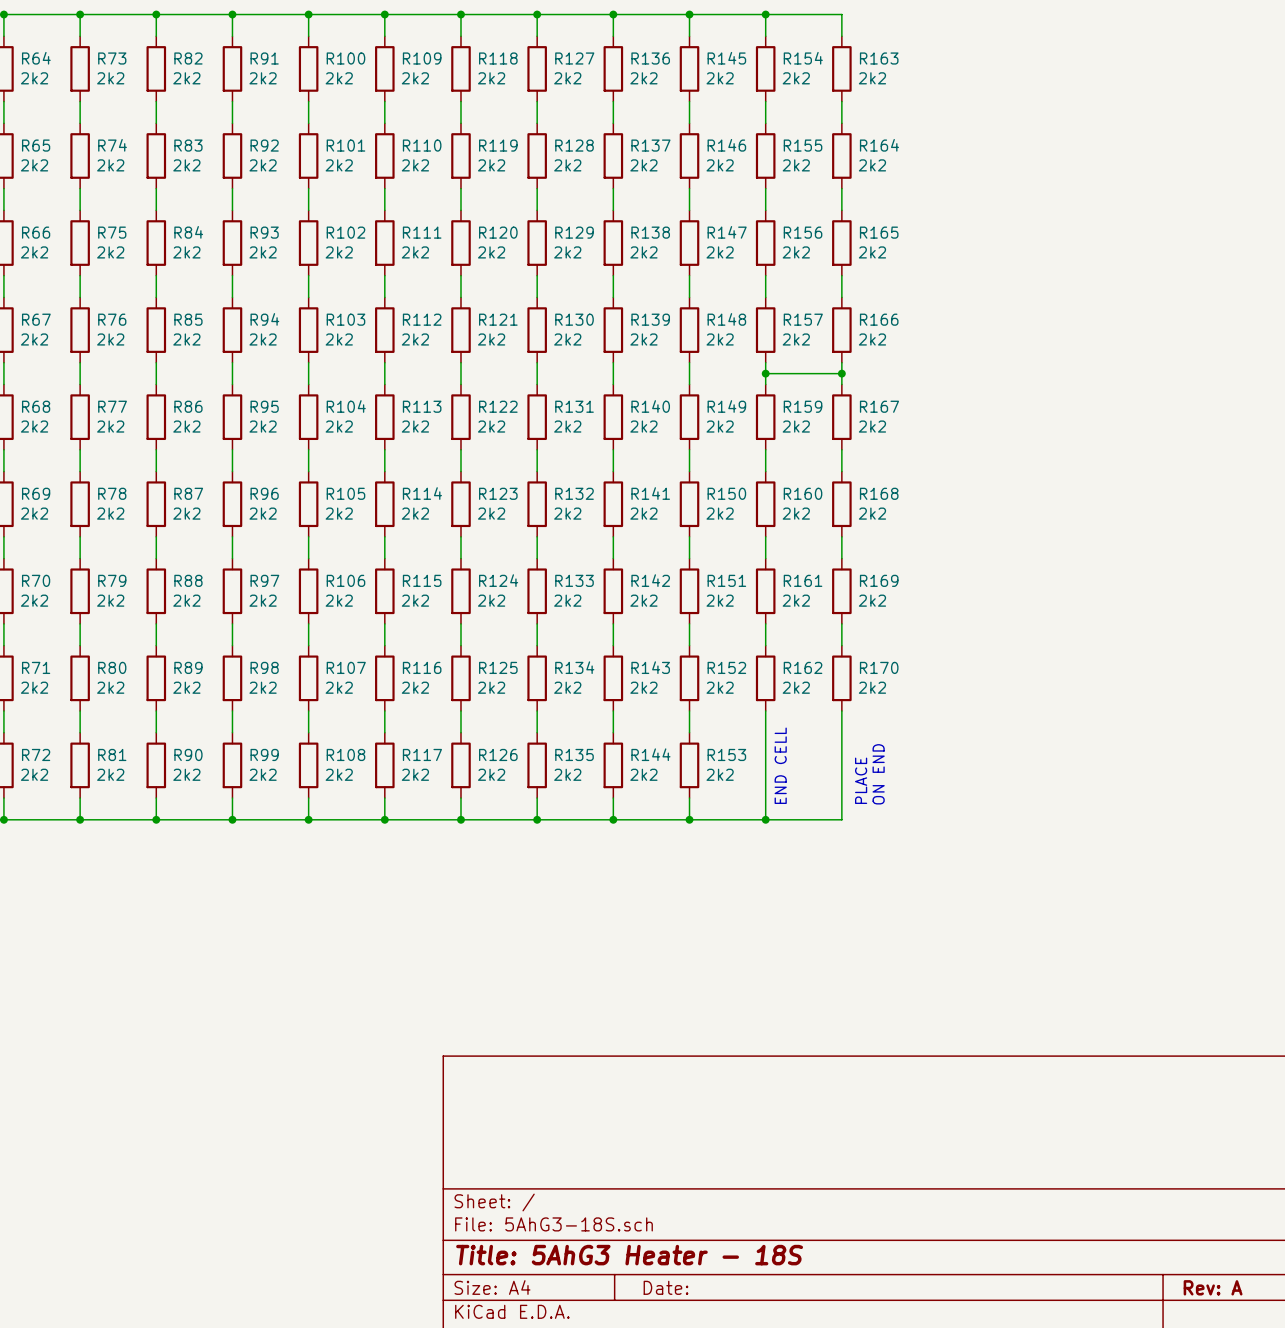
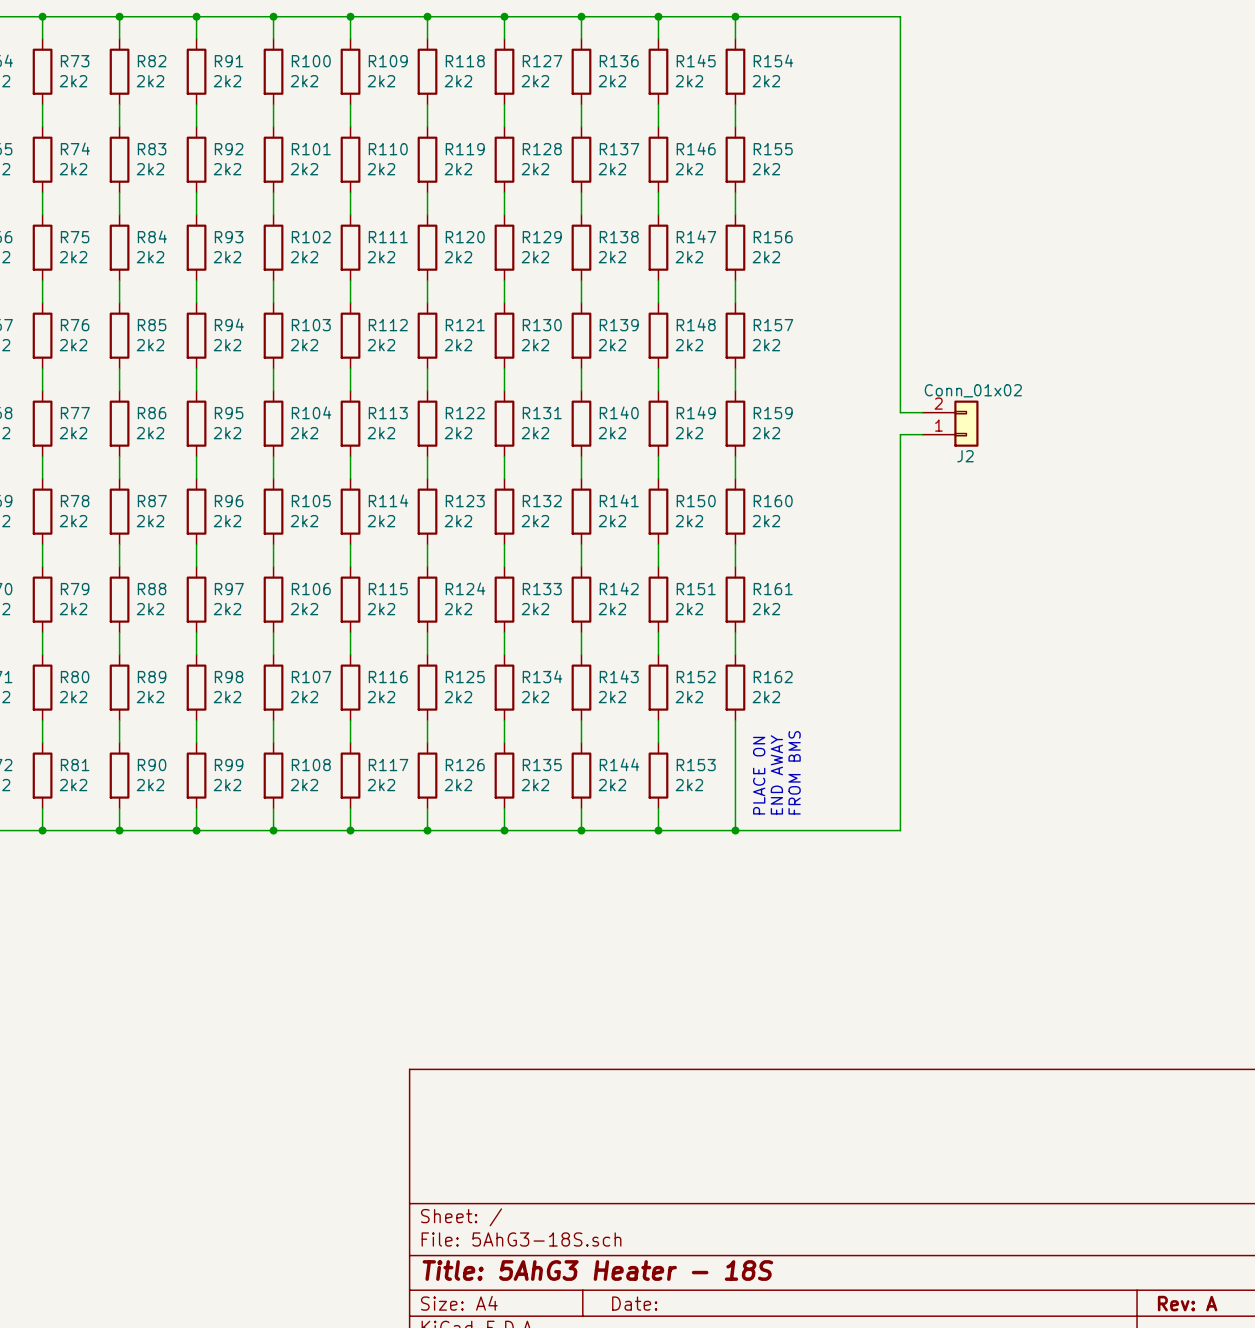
wire: (841, 14) (841, 36) -> (812, 16) (900, 16) (900, 412) (922, 412)
R163: 2k2 (841, 68) -> none
wire: (841, 101) (841, 123) -> none
R164: 2k2 (841, 155) -> none
wire: (841, 188) (841, 210) -> none
R165: 2k2 (841, 243) -> none
wire: (841, 275) (841, 297) -> none
R166: 2k2 (841, 330) -> none
wire: (841, 362) (841, 384) -> none
wire: (765, 373) (841, 373) -> none
junction: (765, 373) -> none
junction: (841, 373) -> none
R167: 2k2 (841, 417) -> none
J2: none -> Conn_01x02 (950, 423)
wire: (841, 449) (841, 471) -> none
R168: 2k2 (841, 504) -> none
wire: (841, 536) (841, 558) -> none
R169: 2k2 (841, 591) -> none
wire: (841, 623) (841, 645) -> none
R170: 2k2 (841, 678) -> none
wire: (841, 710) (841, 819) -> (922, 434) (900, 434) (900, 830) (812, 830)
text: none -> FROM BMS (794, 772)
text: none -> END AWAY (776, 774)
text: END CELL (780, 765) -> PLACE ON (759, 775)
text: ON END (878, 774) -> none
text: PLACE (861, 780) -> none

